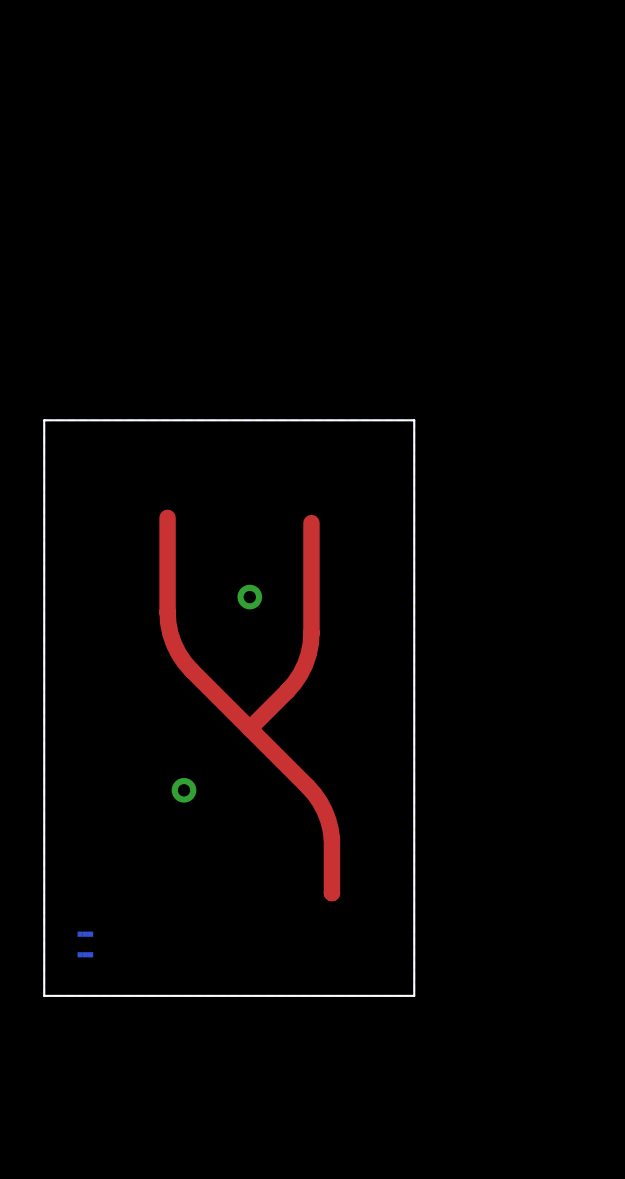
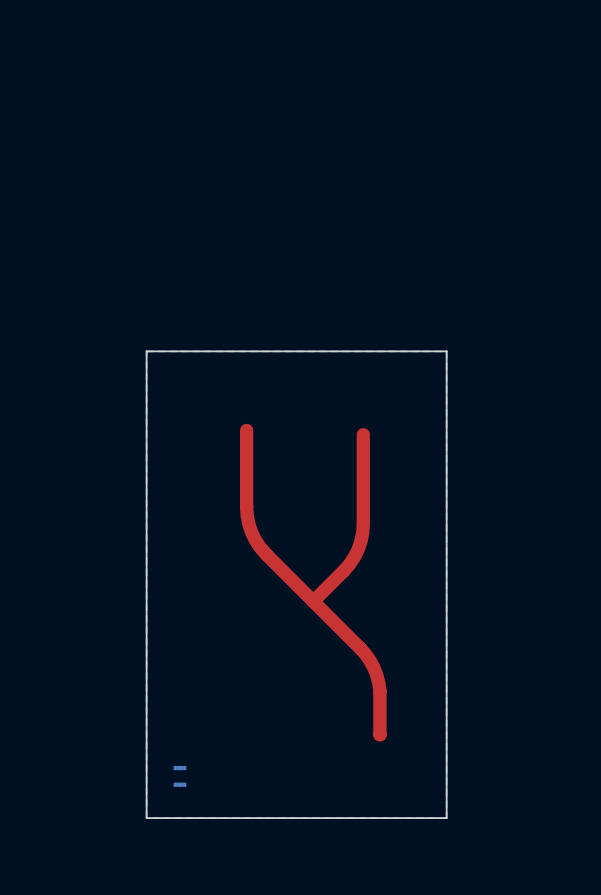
via: (249, 597) -> none
via: (184, 790) -> none

